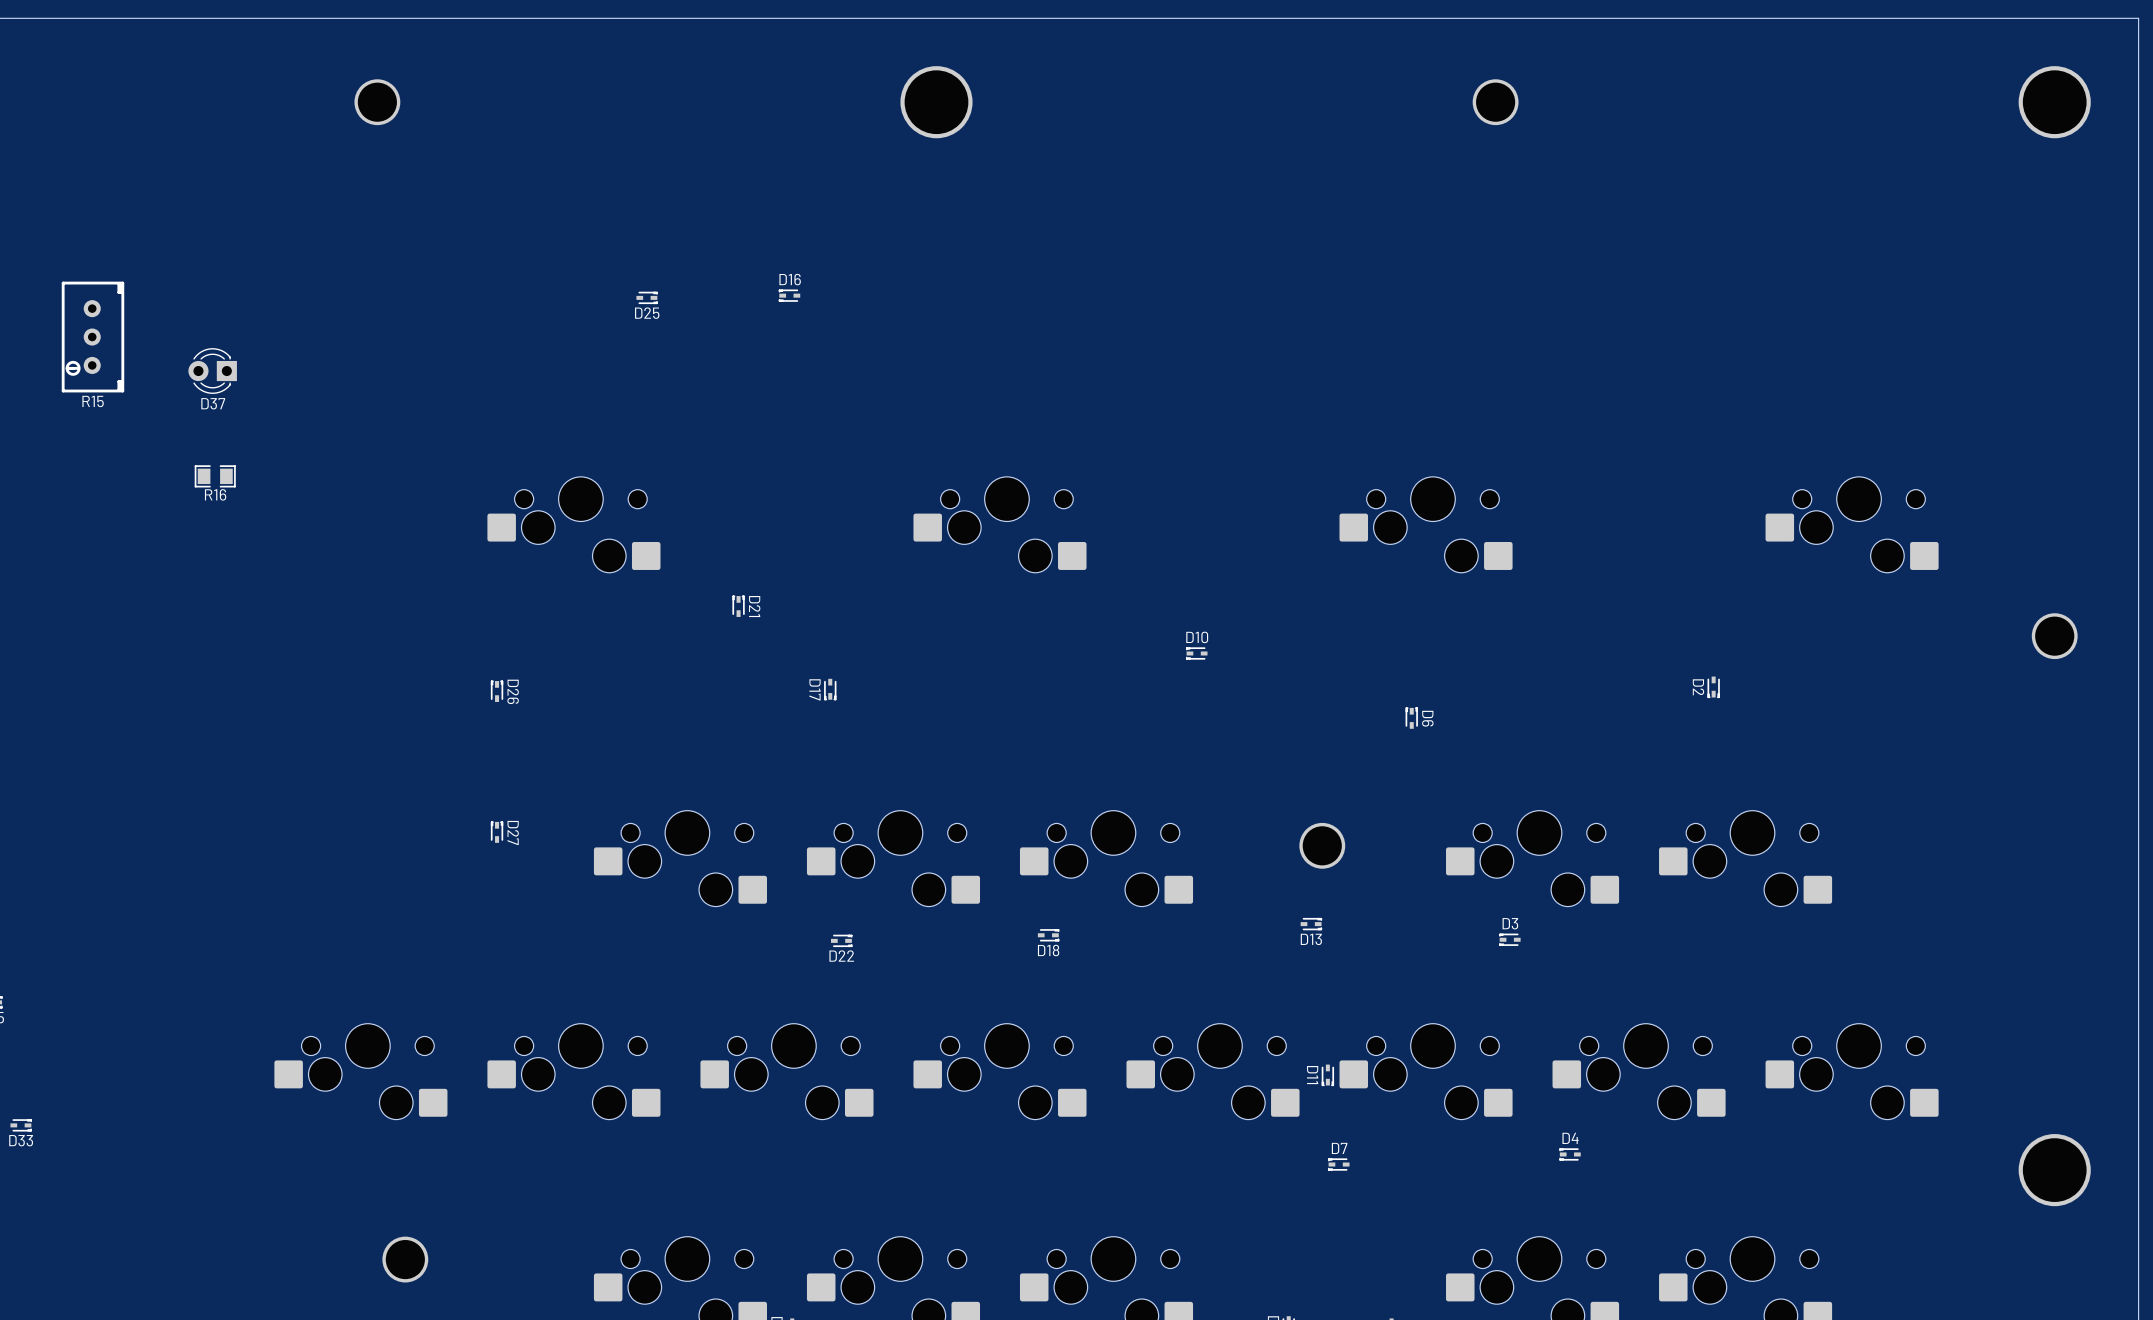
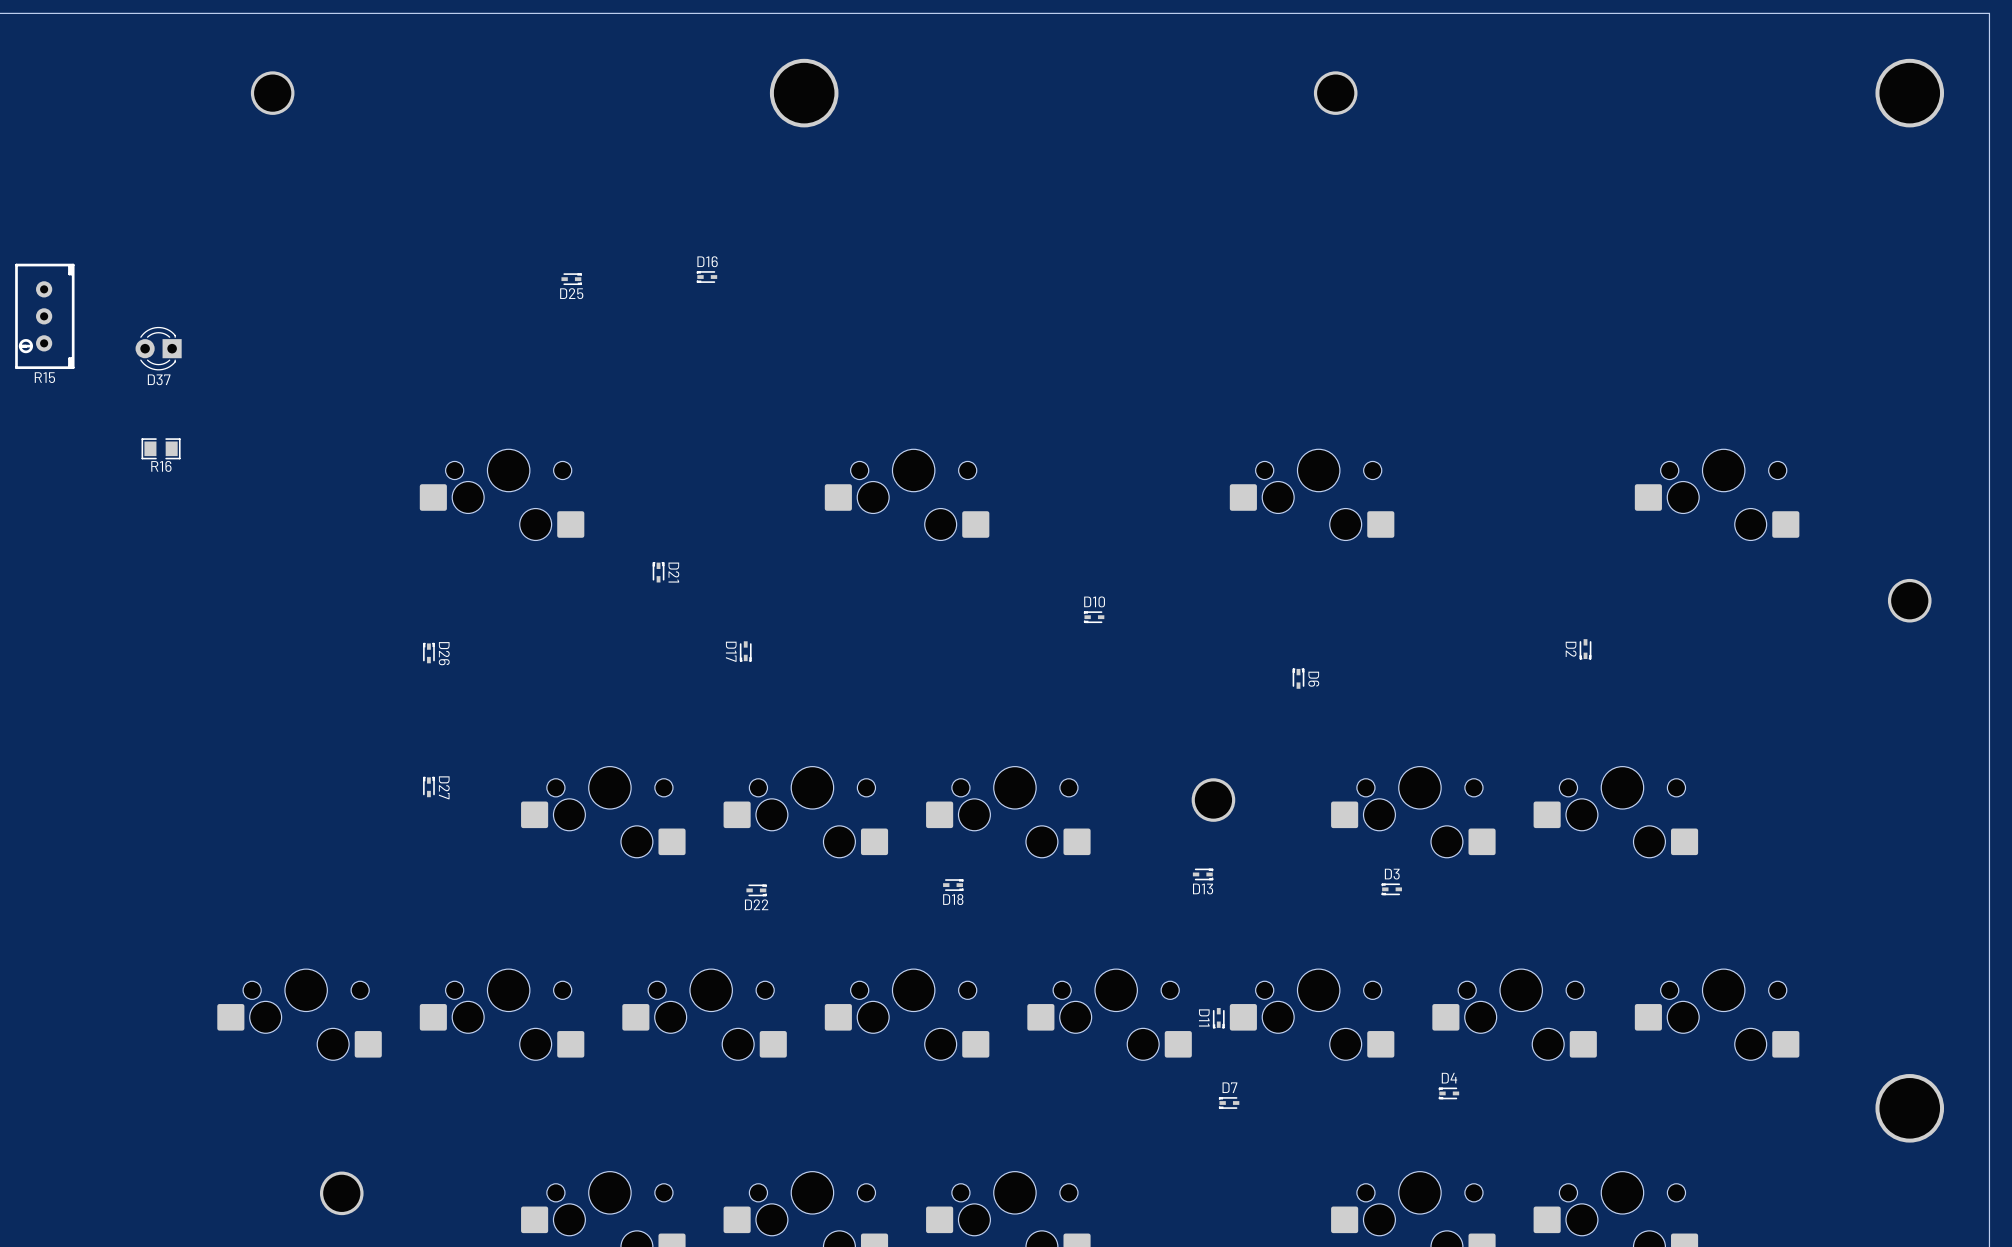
part position: (377, 102) -> (272, 93)
part position: (936, 102) -> (804, 93)
part position: (1495, 102) -> (1335, 93)

